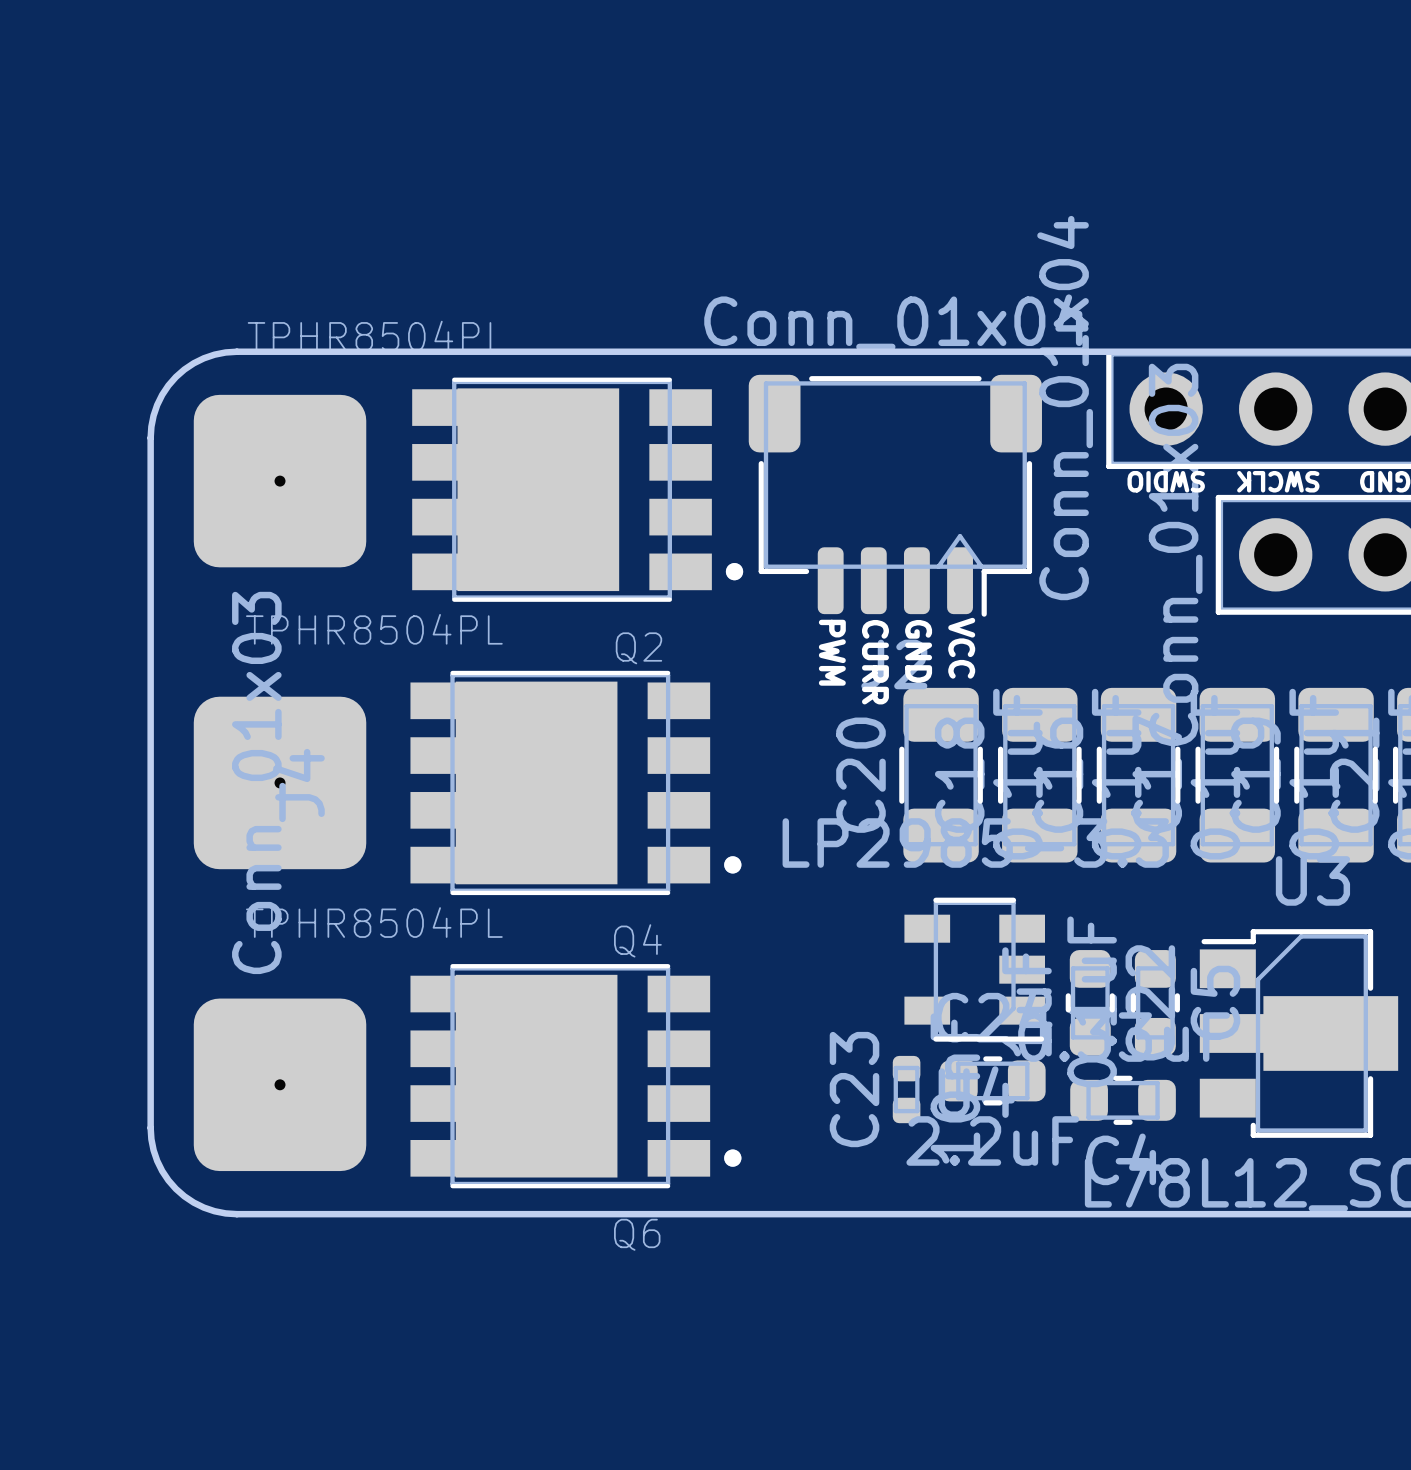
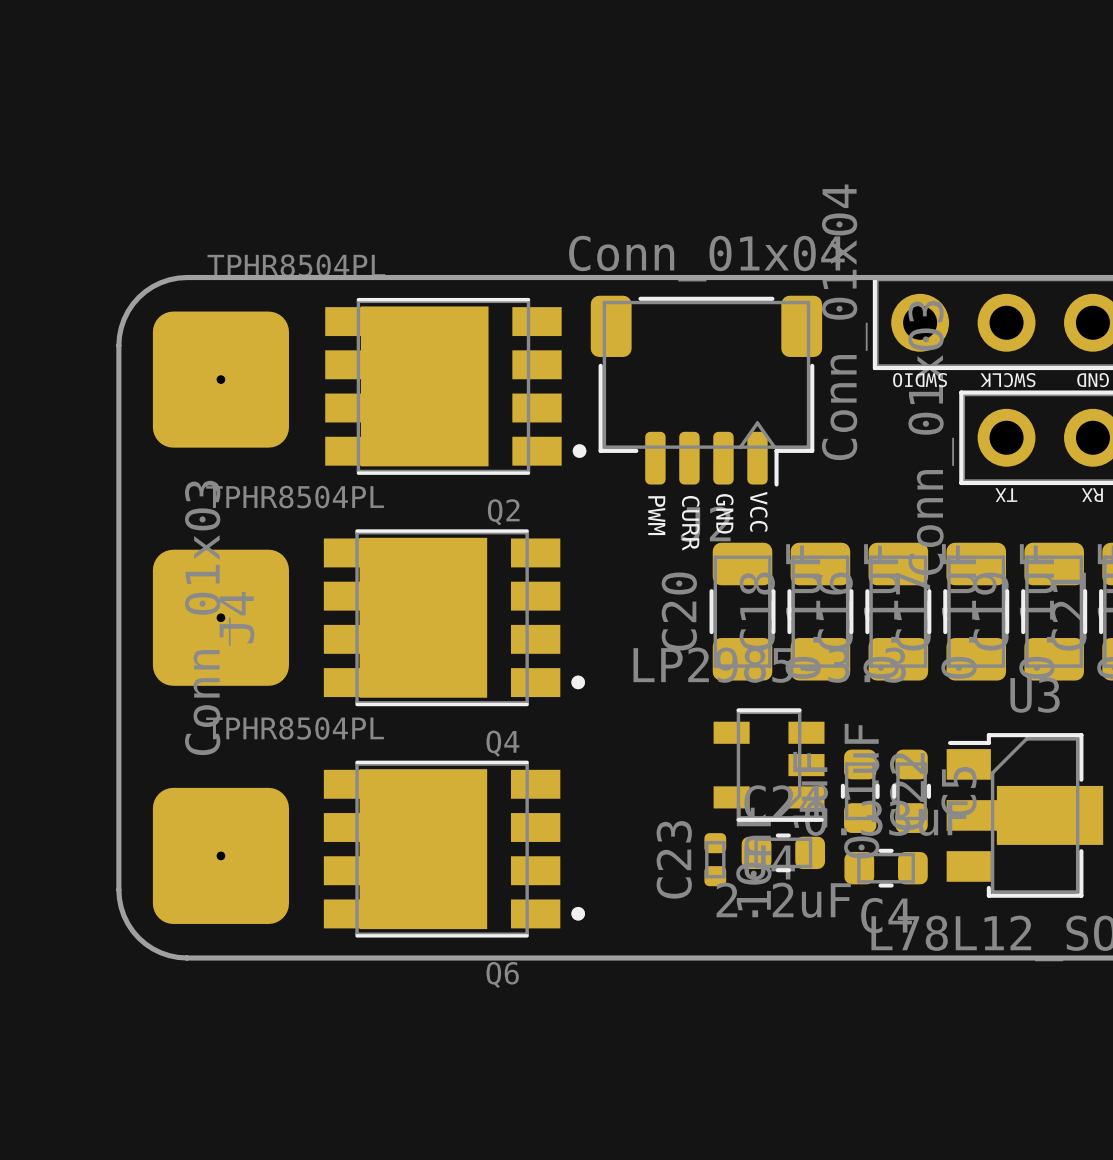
text: none -> TX (1006, 495)
text: none -> RX (1092, 495)

